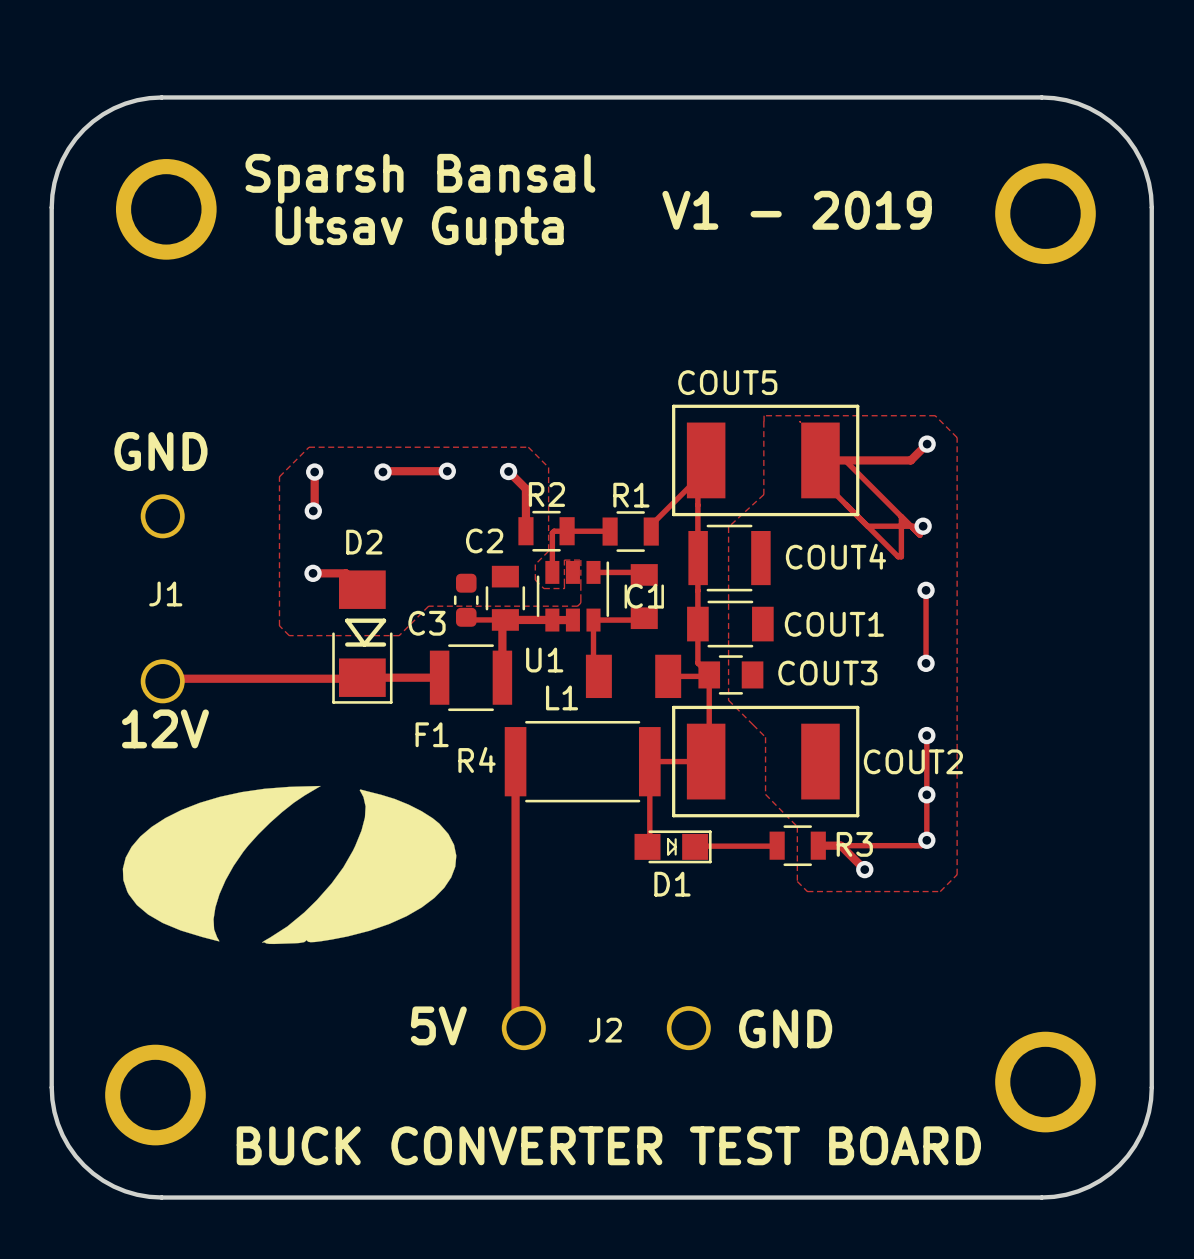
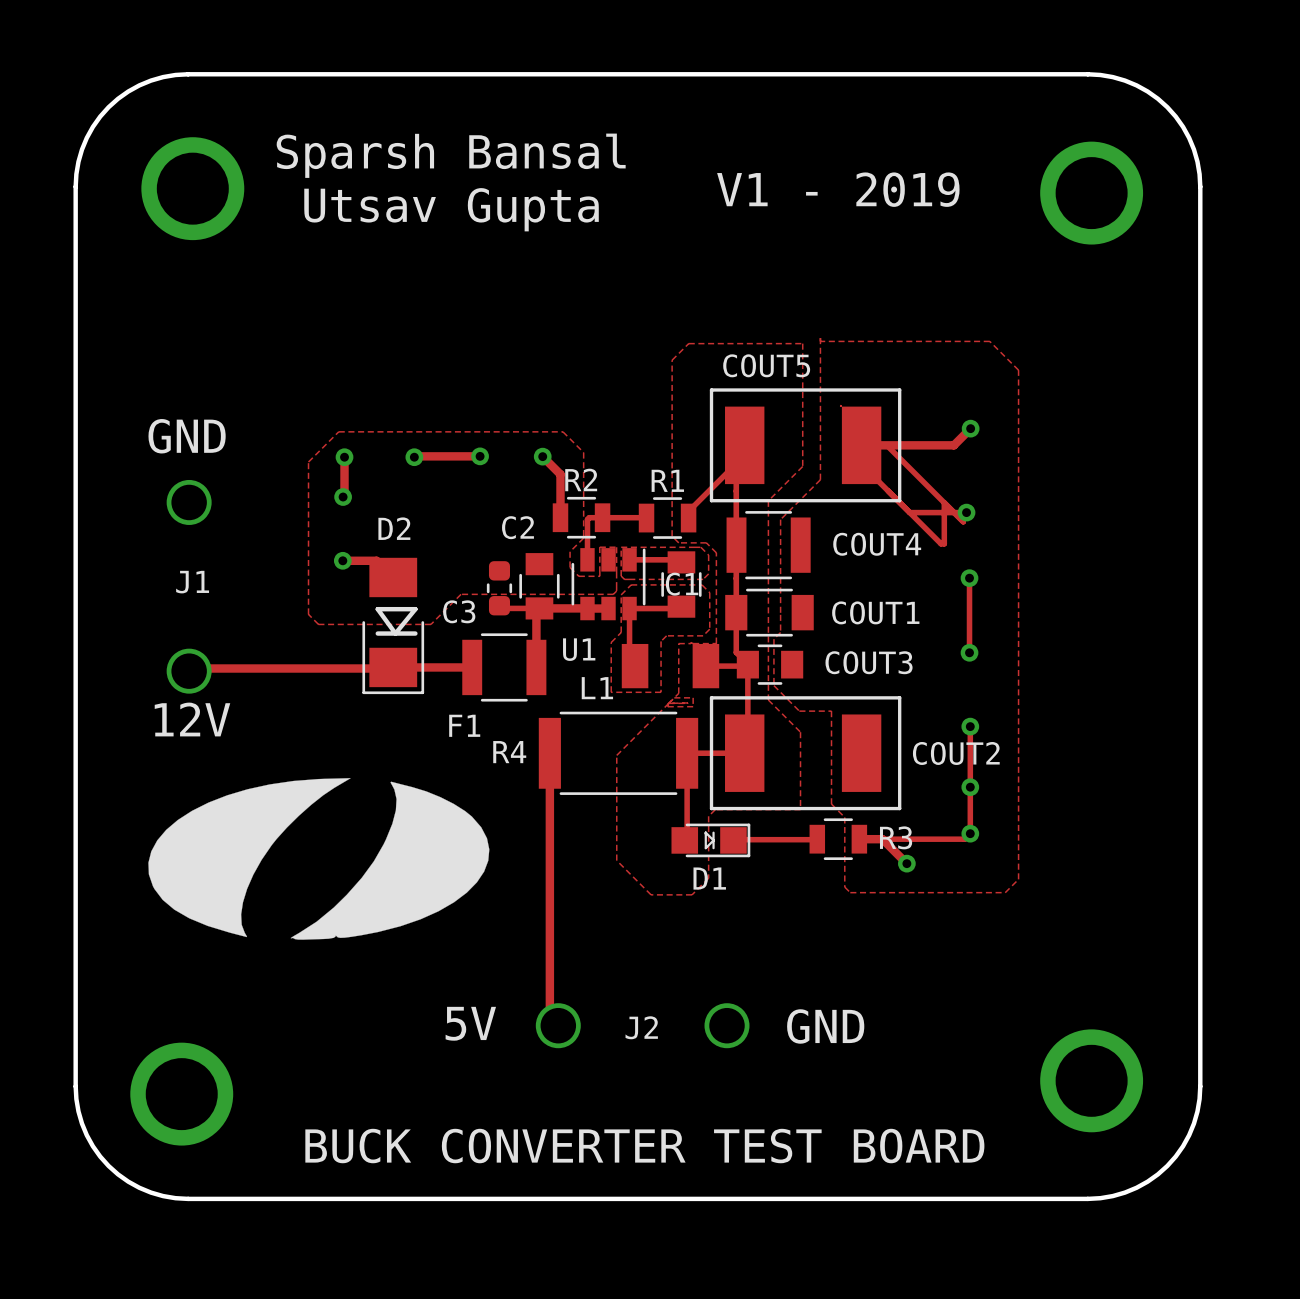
zone outline: none -> (820, 338) (820, 479) (780, 519) (780, 632) (773, 639) (773, 685) (799, 711) (831, 711) (831, 804) (844, 817) (844, 887) (850, 892) (1005, 892) (1018, 879) (1018, 370) (989, 341) (820, 341)
zone outline: none -> (688, 343) (672, 360) (672, 536) (678, 542) (706, 542) (716, 552) (716, 643) (678, 643) (678, 693) (616, 755) (616, 860) (651, 894) (692, 894) (708, 878) (708, 816) (715, 809) (800, 809) (800, 732) (768, 700) (768, 500) (802, 466) (802, 343) (688, 343)
zone outline: (764, 421) (764, 415) (935, 415) (957, 437) (957, 874) (940, 891) (807, 891) (797, 881) (797, 826) (765, 794) (765, 737) (728, 700) (728, 527) (763, 494) (763, 421) -> none
zone outline: none -> (621, 547) (700, 547) (708, 555) (708, 573) (703, 579) (624, 579) (621, 576) (621, 547)
zone outline: none -> (631, 584) (621, 594) (621, 632) (611, 642) (611, 692) (661, 692) (661, 641) (666, 635) (703, 635) (709, 629) (709, 592) (701, 584) (631, 584)
zone outline: none -> (674, 697) (693, 697) (693, 706) (667, 706) (667, 704)
zone outline: none -> (688, 702) (687, 703) (668, 703) (688, 702)

